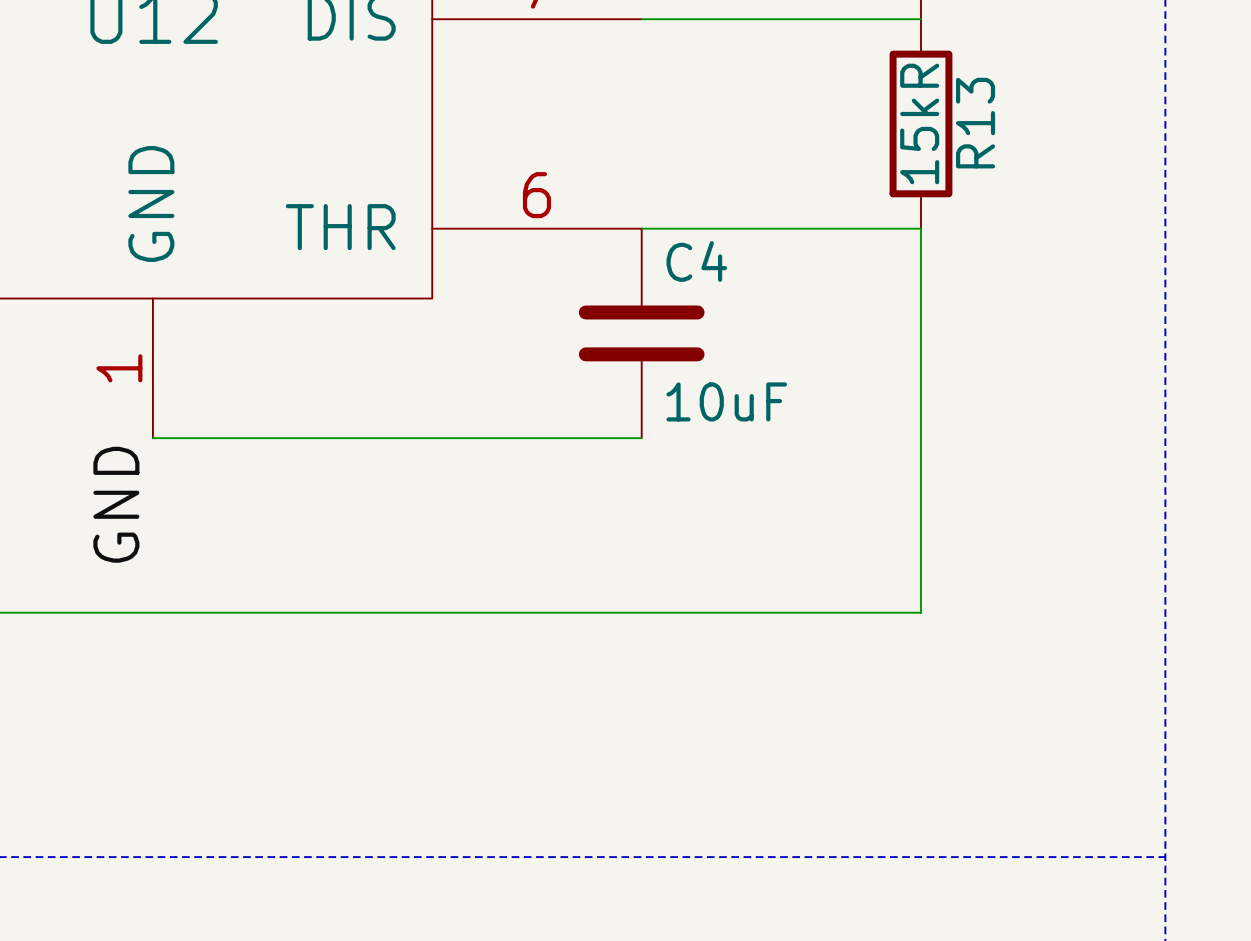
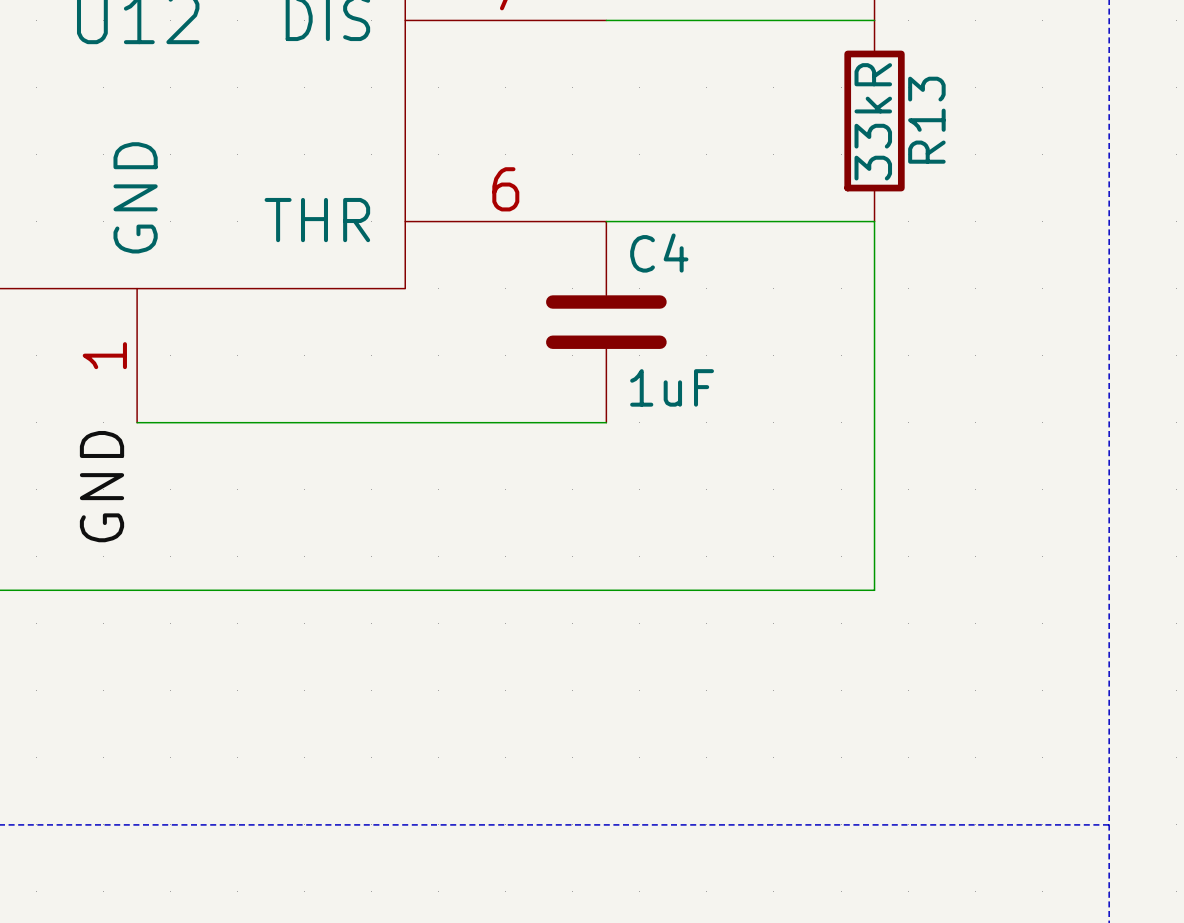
R13 value: 15kR (919, 123) -> 33kR (873, 121)
C4 value: 10uF (726, 401) -> 1uF (672, 387)

